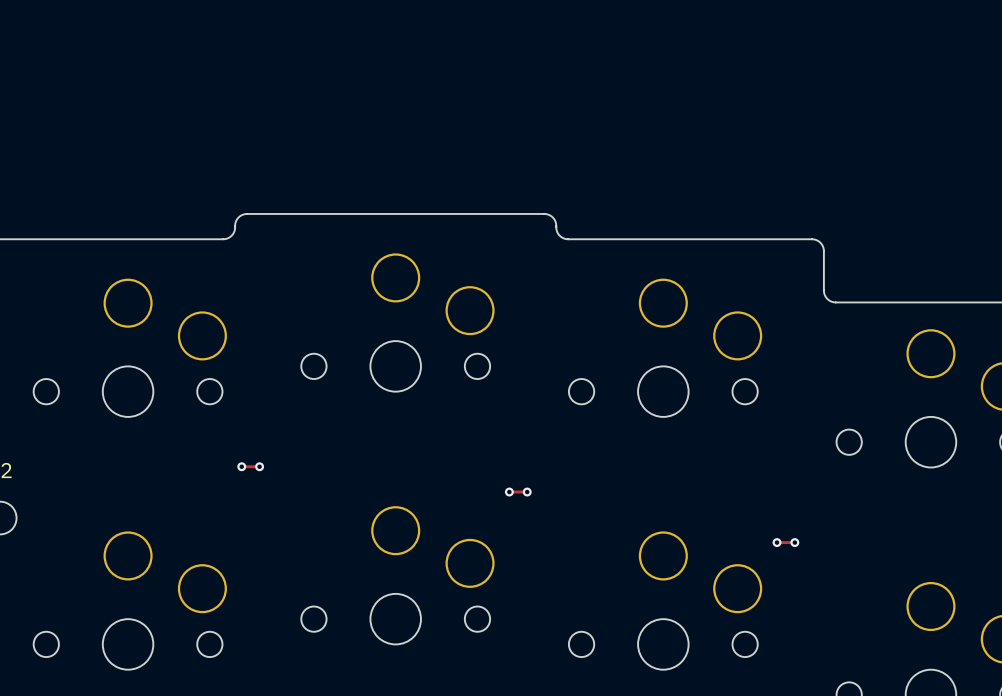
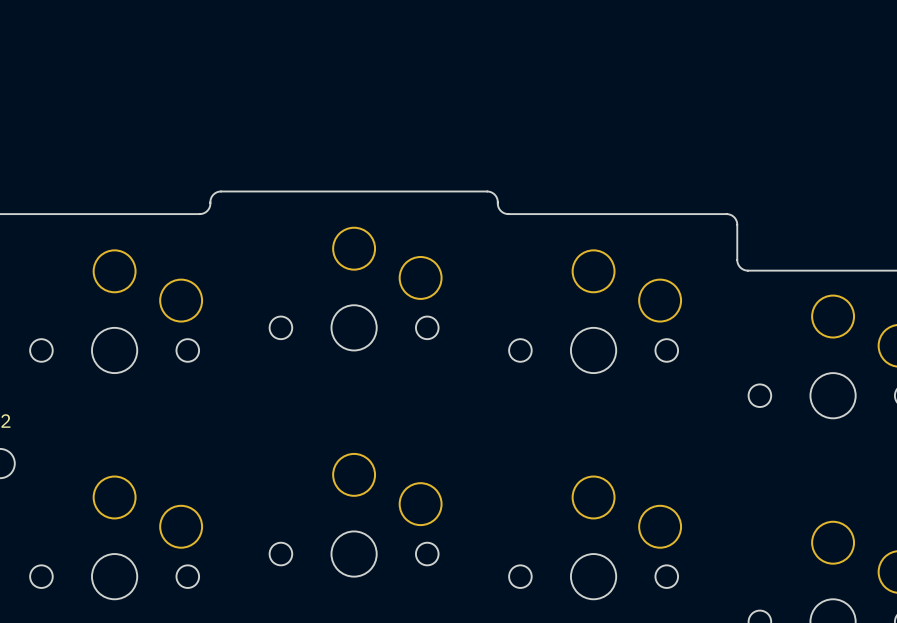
track: (241, 466) (259, 466) -> none
via: (241, 466) -> none
via: (259, 466) -> none
track: (509, 492) (527, 492) -> none
via: (509, 492) -> none
via: (527, 492) -> none
track: (777, 542) (794, 542) -> none
via: (777, 542) -> none
via: (794, 542) -> none

